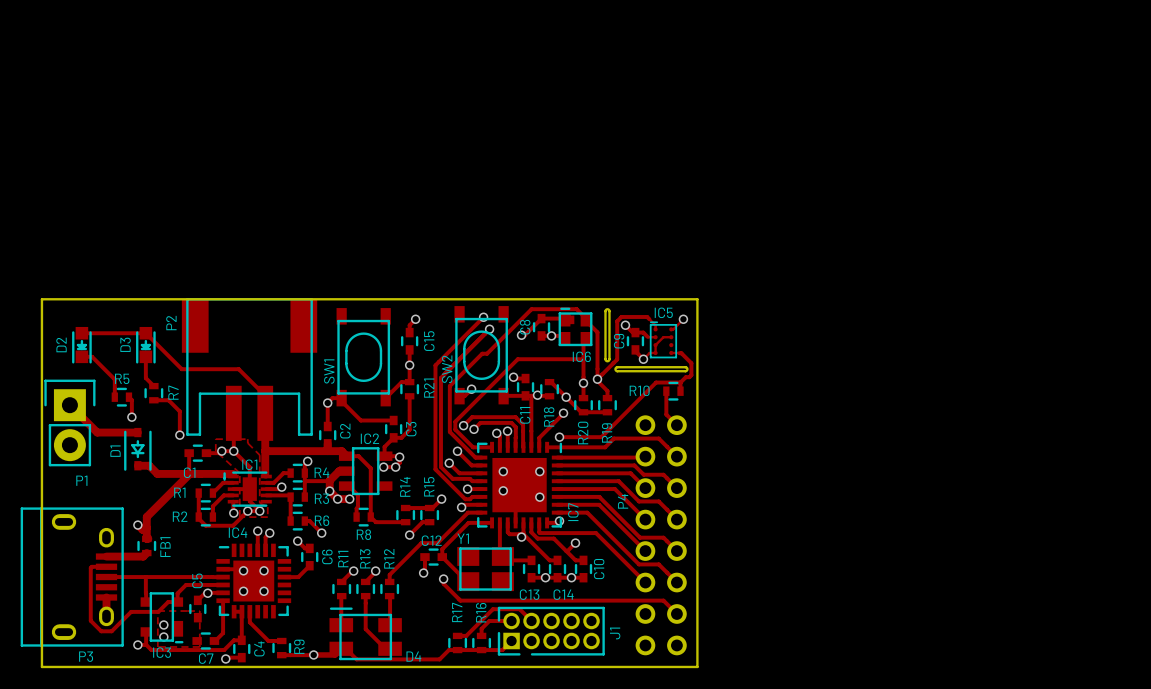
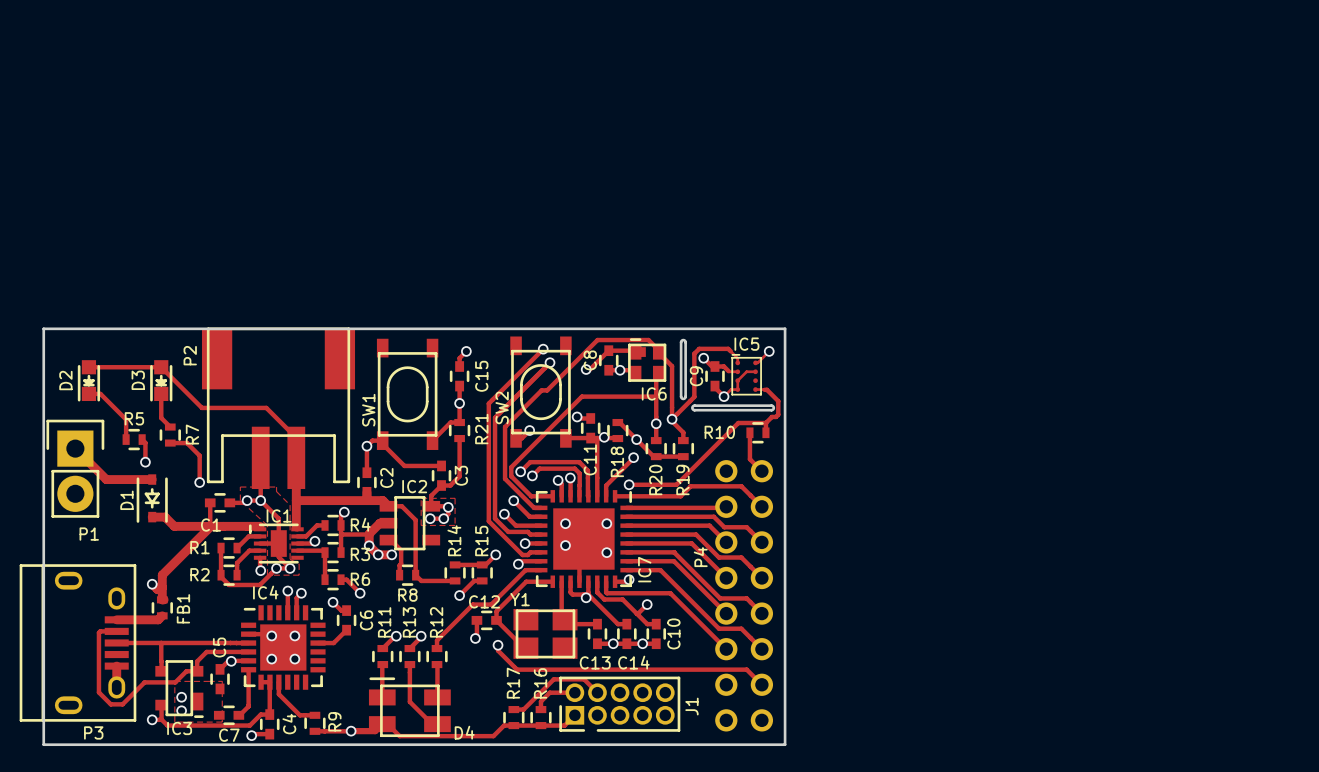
zone outline: none -> (421, 498) (455, 498) (455, 525) (421, 525) (421, 498)

